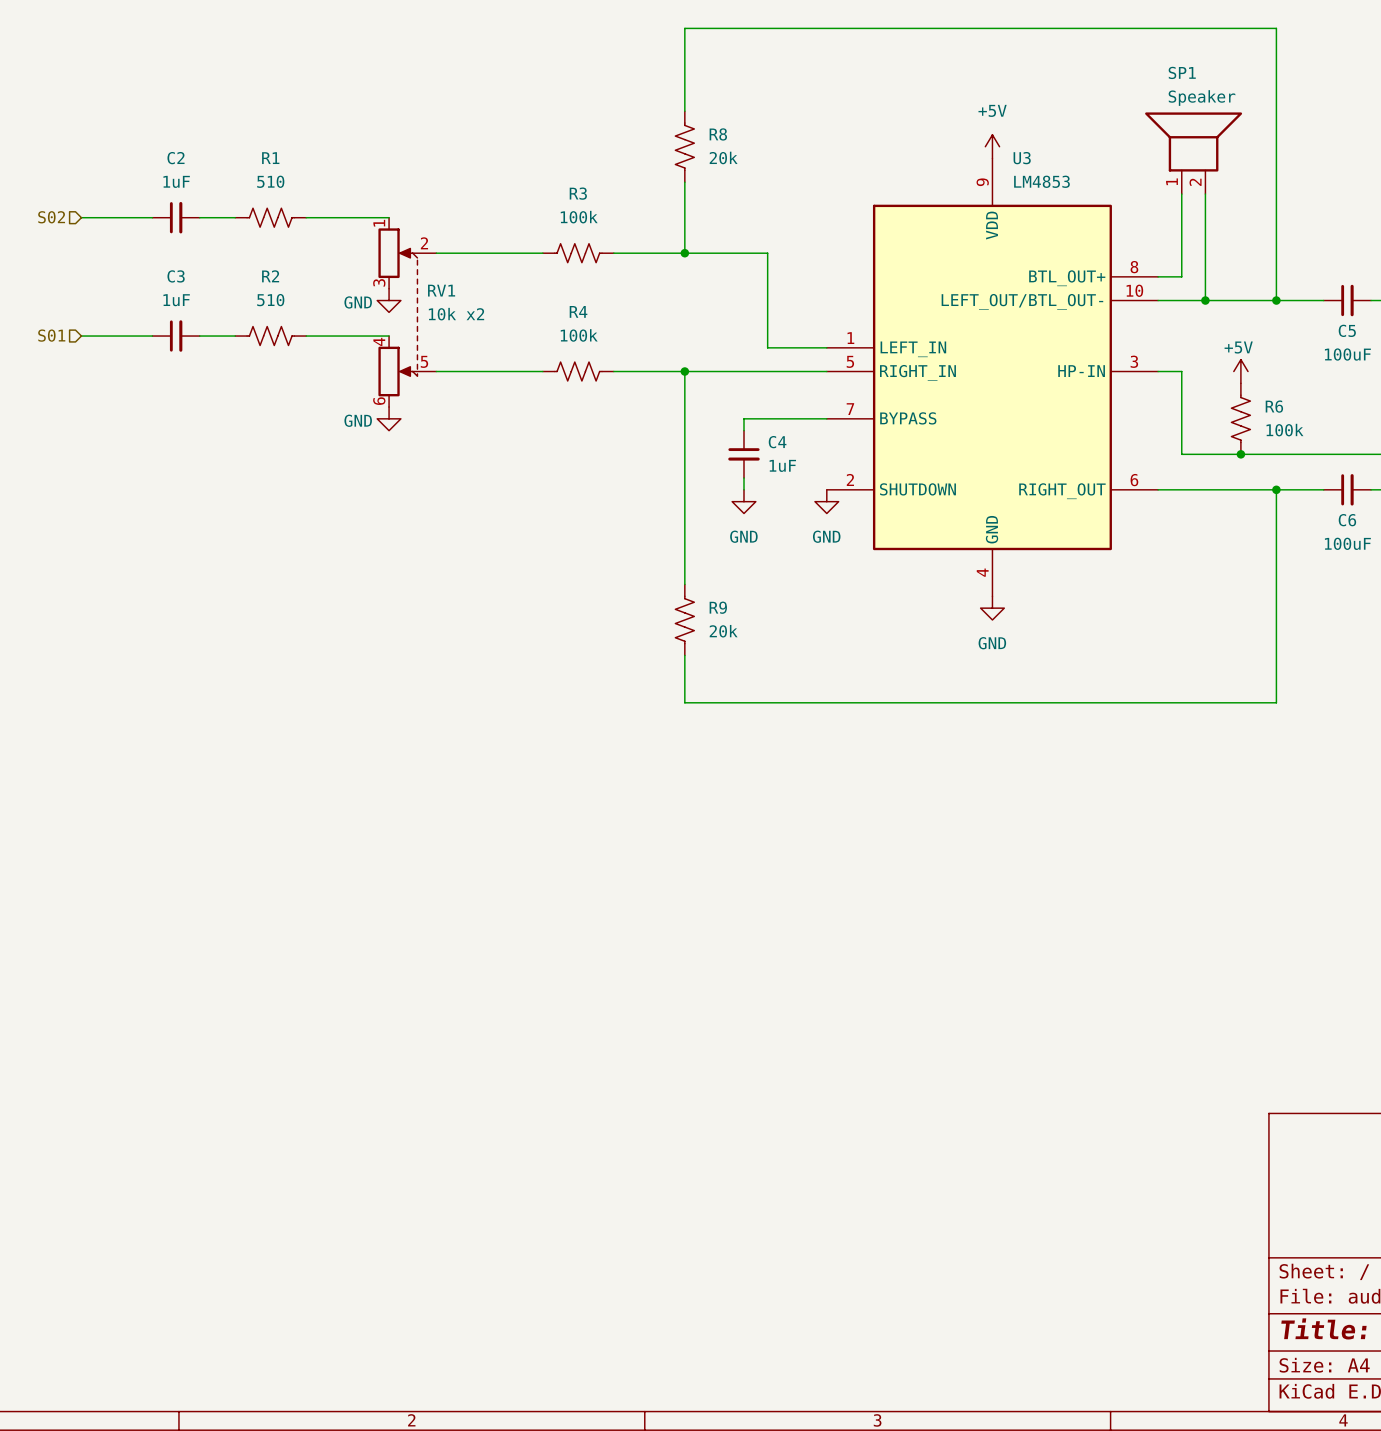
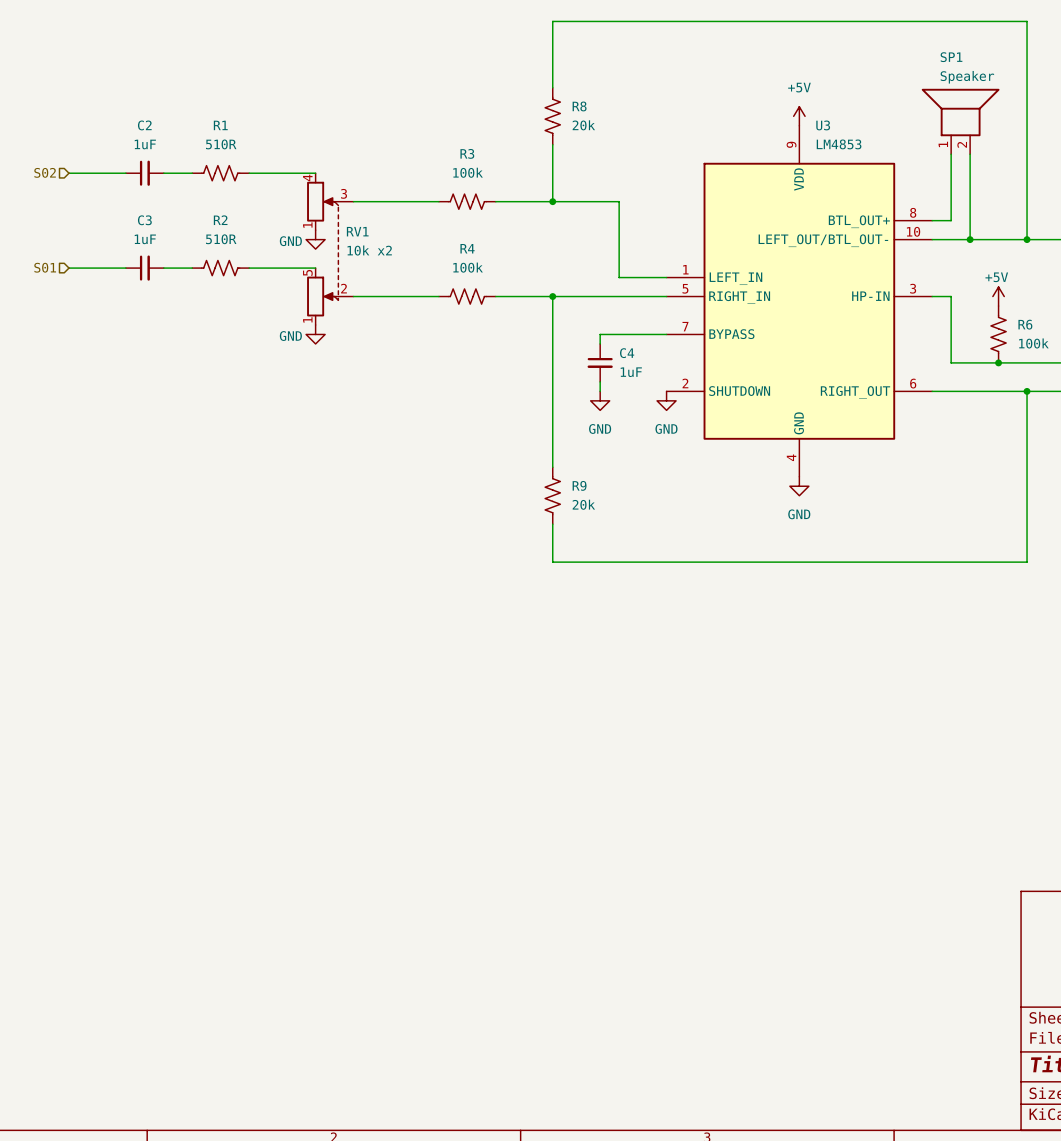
R1 value: 510 (270, 181) -> 510R (221, 144)
RV1 pin number: 1 (379, 223) -> 4 (307, 177)
RV1 pin number: 2 (424, 243) -> 3 (344, 193)
RV1 pin number: 3 (379, 282) -> 1 (307, 225)
R2 value: 510 (270, 300) -> 510R (221, 239)
RV1 pin number: 4 (379, 341) -> 5 (307, 272)
RV1 pin number: 5 (424, 361) -> 2 (343, 288)
RV1 pin number: 6 (379, 401) -> 1 (307, 319)

